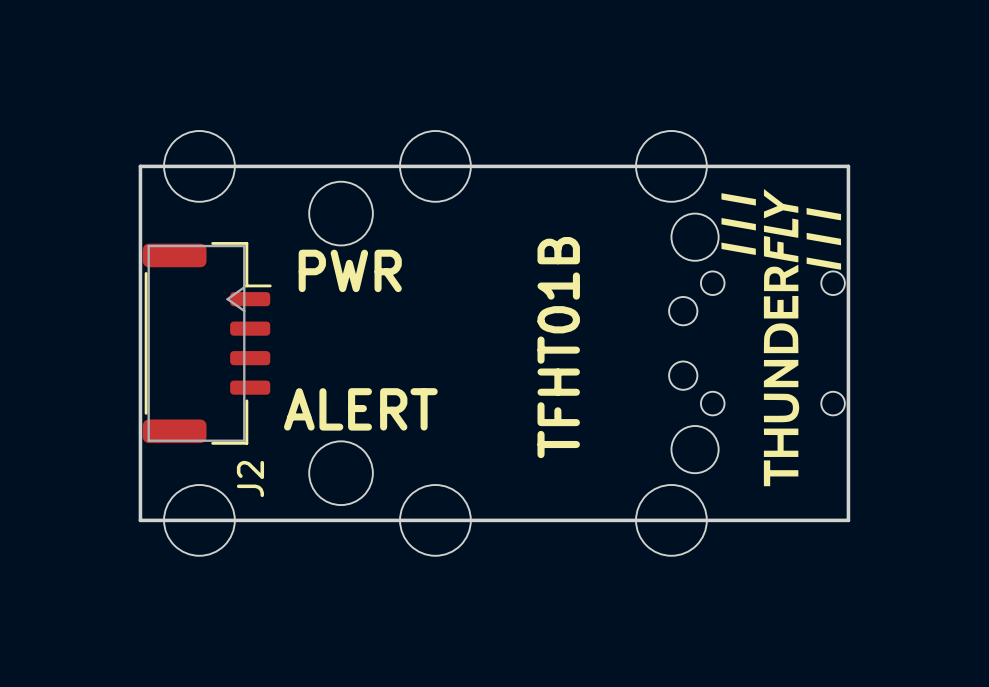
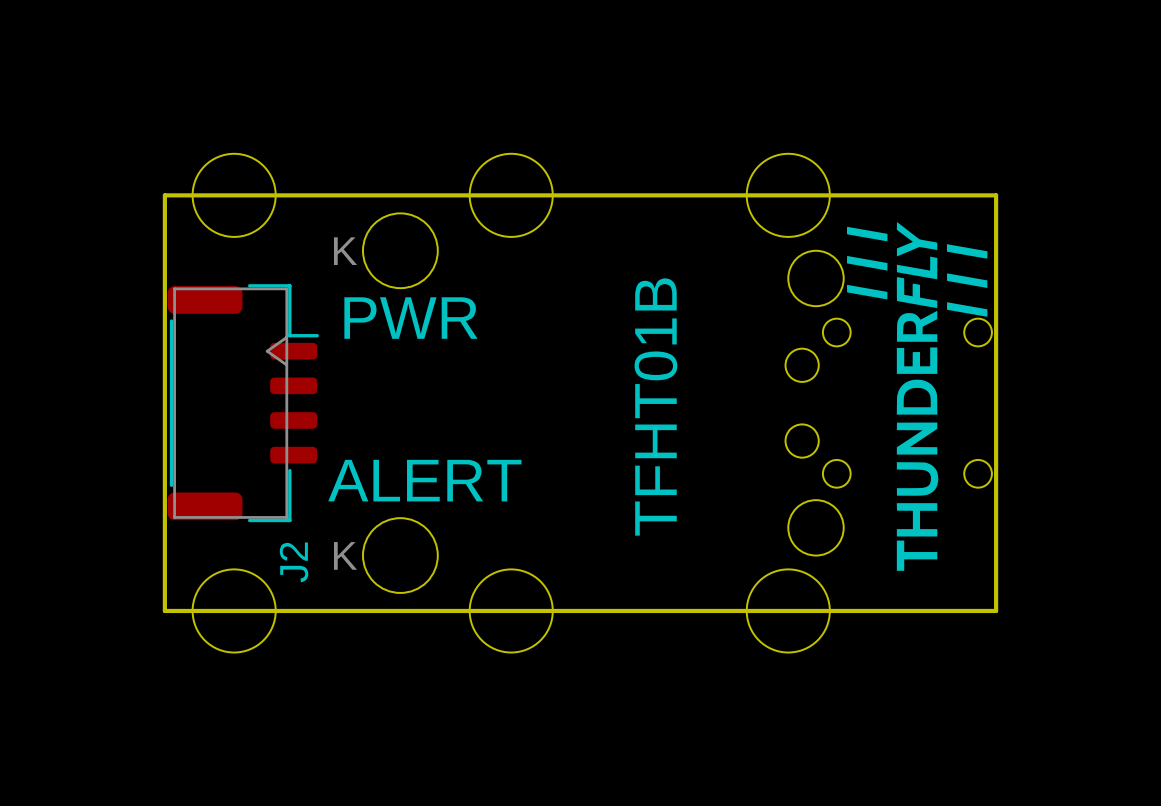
part text: none -> K (345, 251)
part text: none -> K (345, 555)

